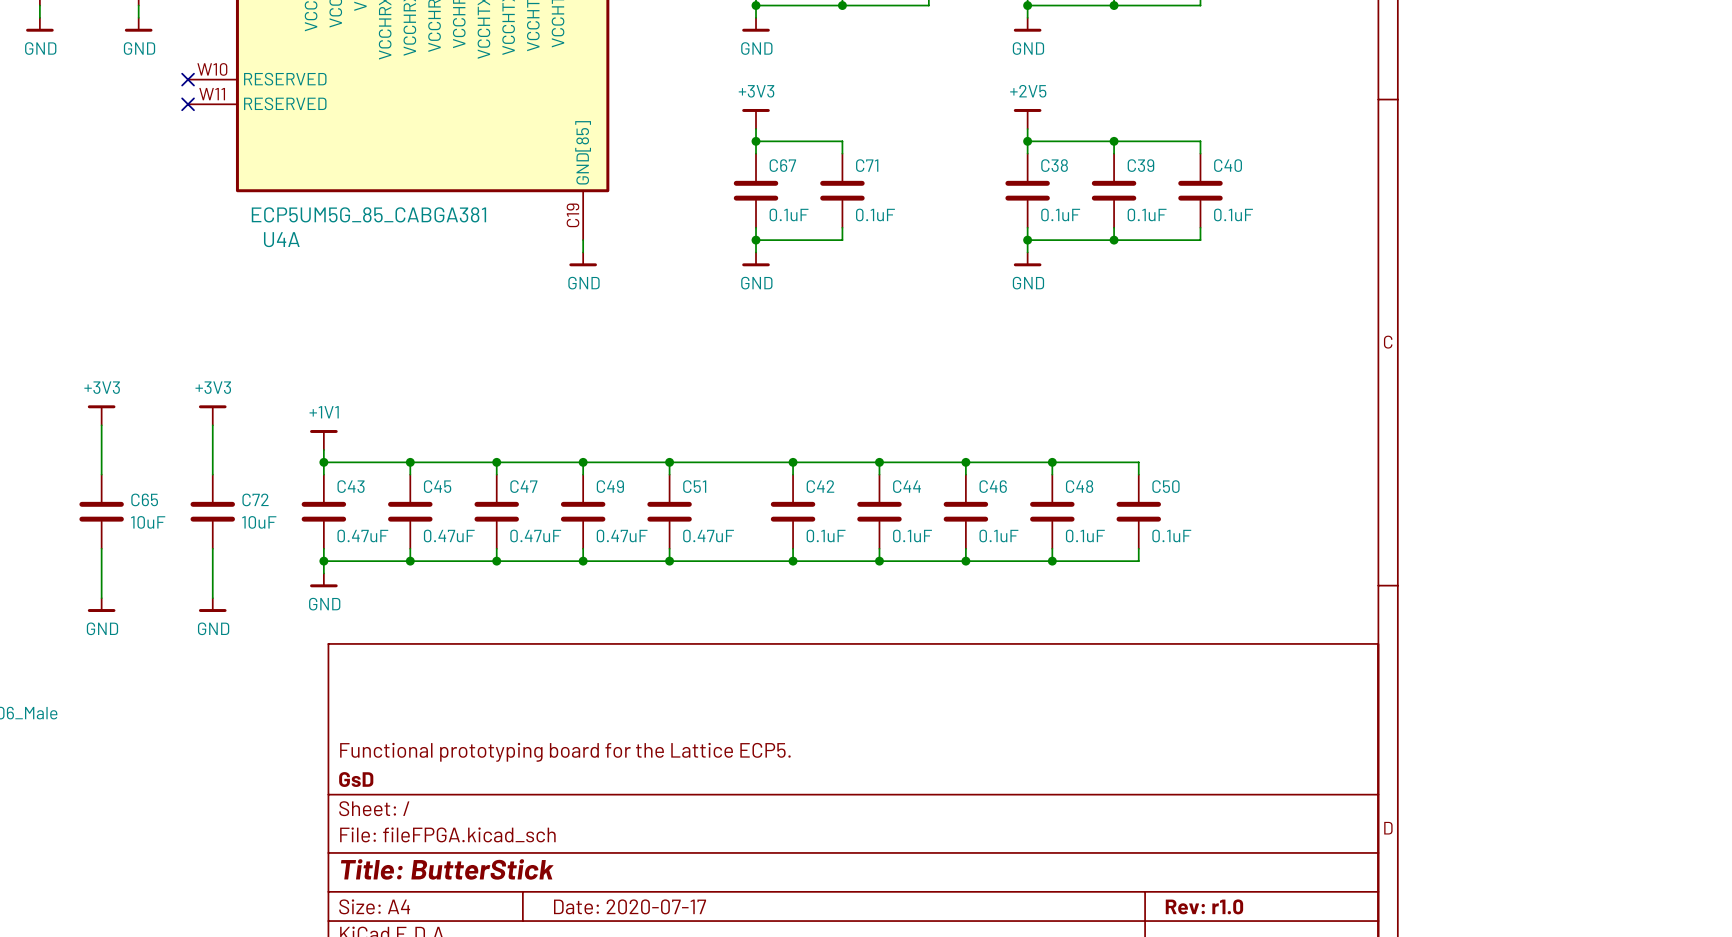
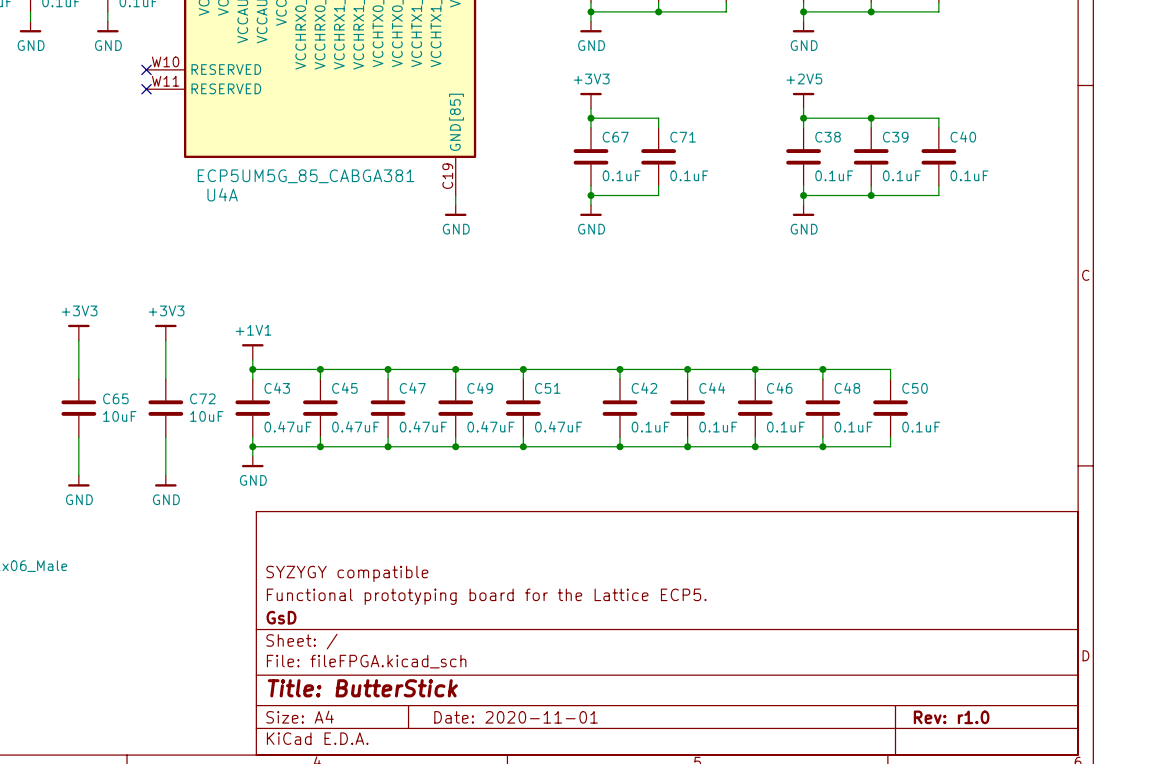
title block: none -> SYZYGY compatible (347, 573)
title block: Date: 2020-07-17 (630, 906) -> Date: 2020-11-01 (516, 717)

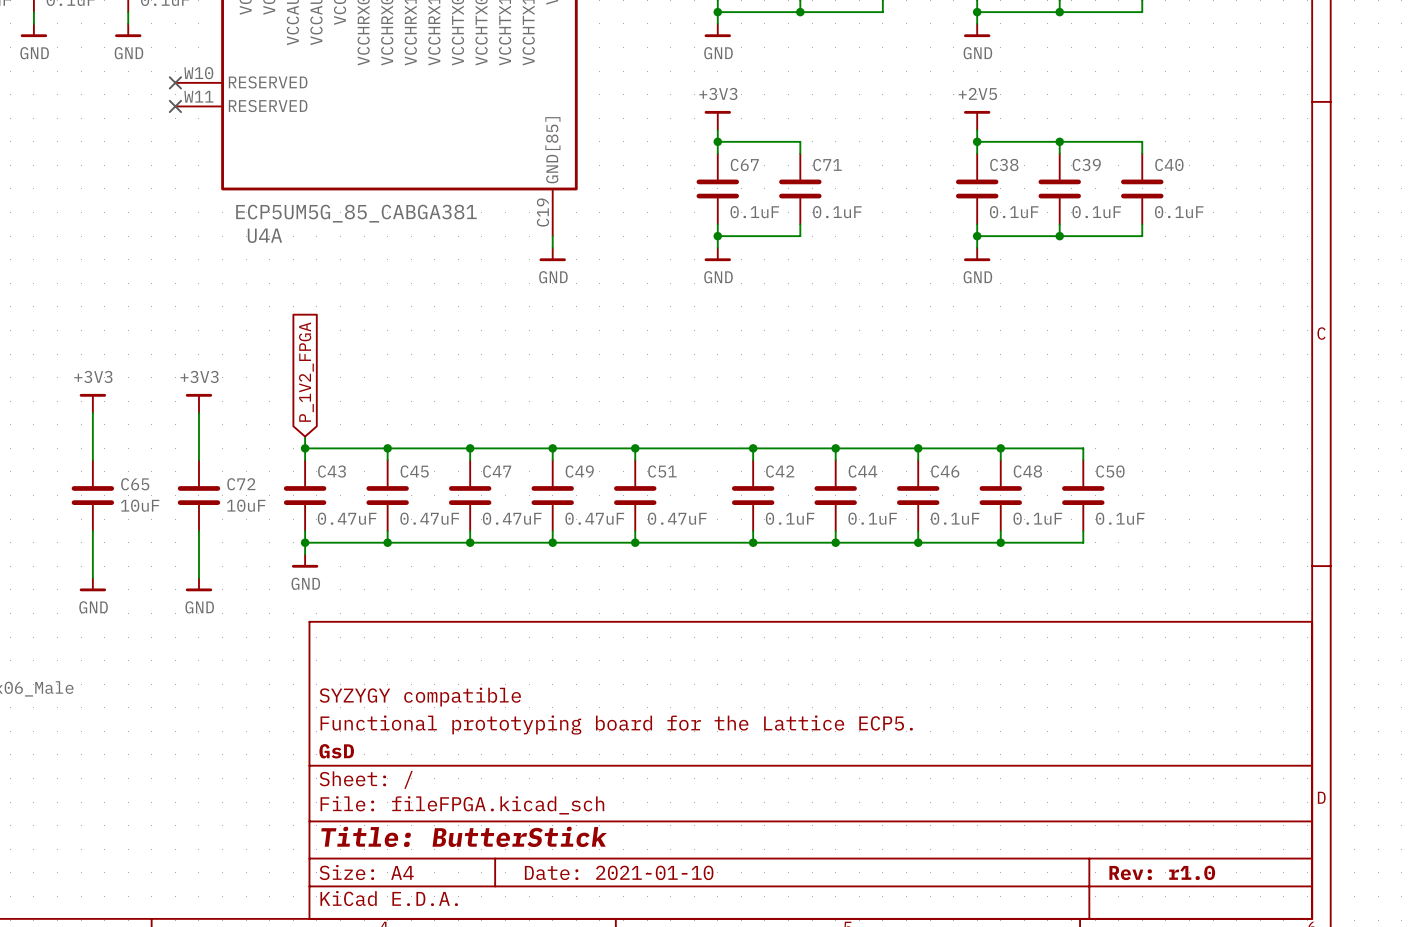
global label: none -> P_1V2_FPGA (306, 372)
power symbol: +1V1 (252, 351) -> none
title block: Date: 2020-11-01 (516, 717) -> Date: 2021-01-10 (619, 872)

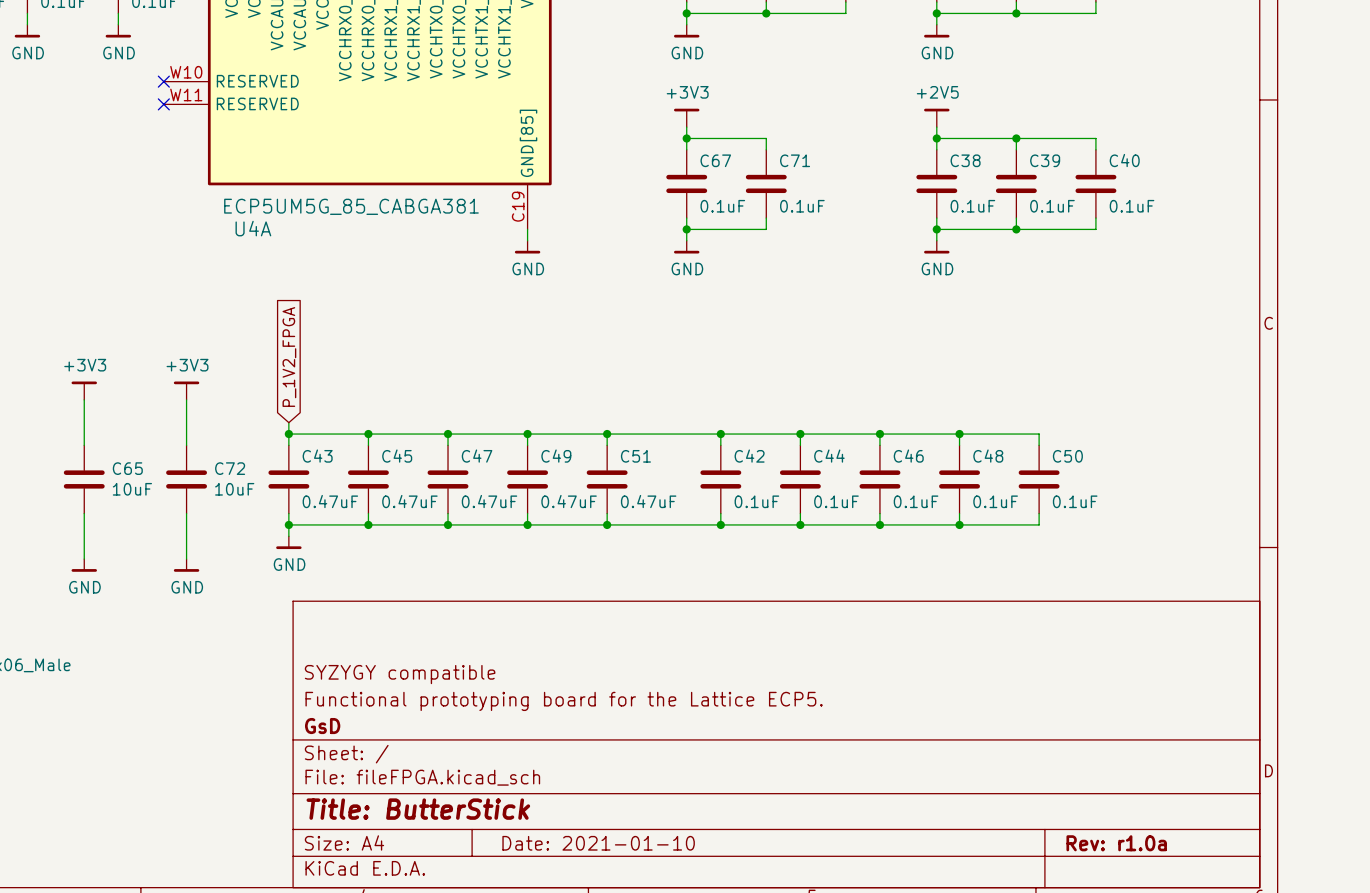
title block: Rev: r1.0 (1162, 872) -> Rev: r1.0a (1116, 843)

